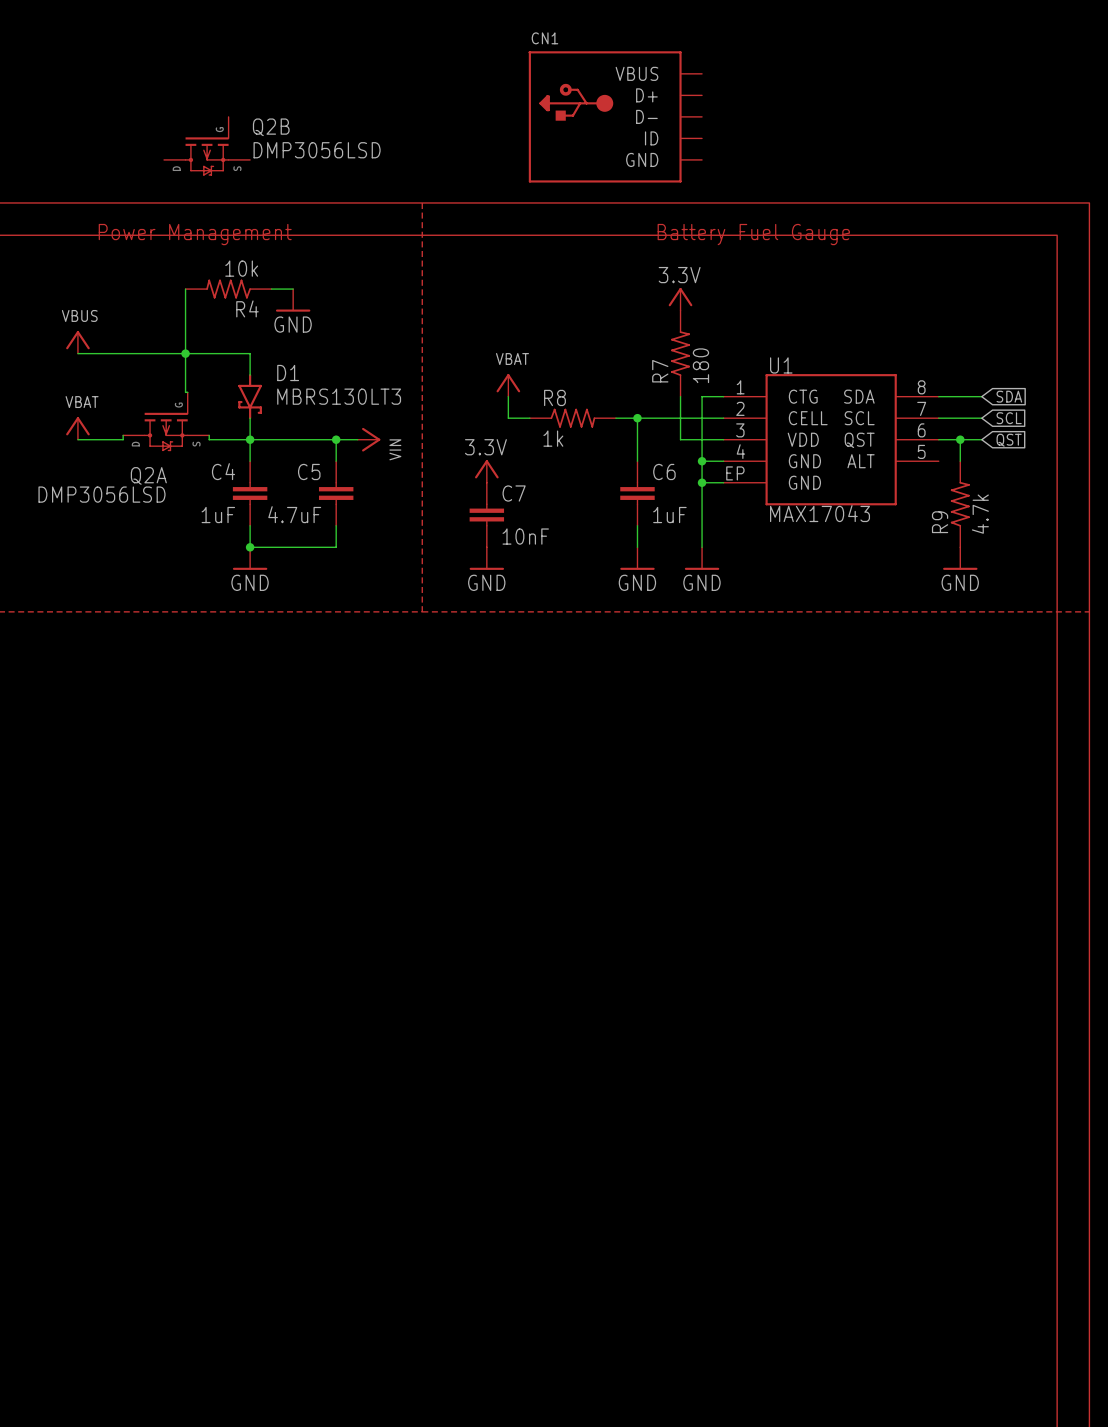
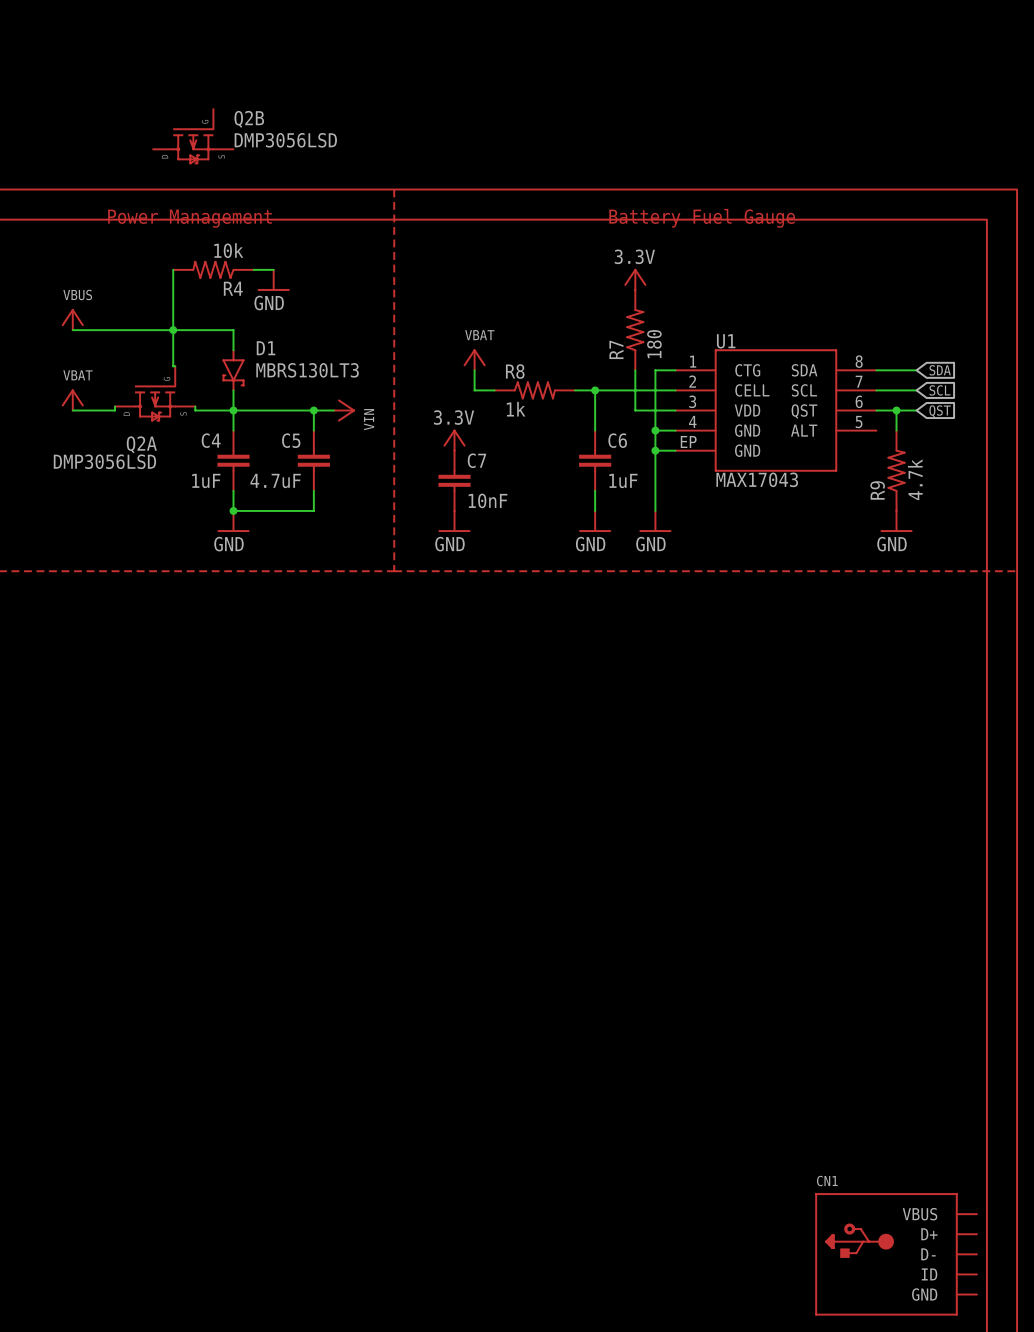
CN1 position: (615, 116) -> (895, 1254)

